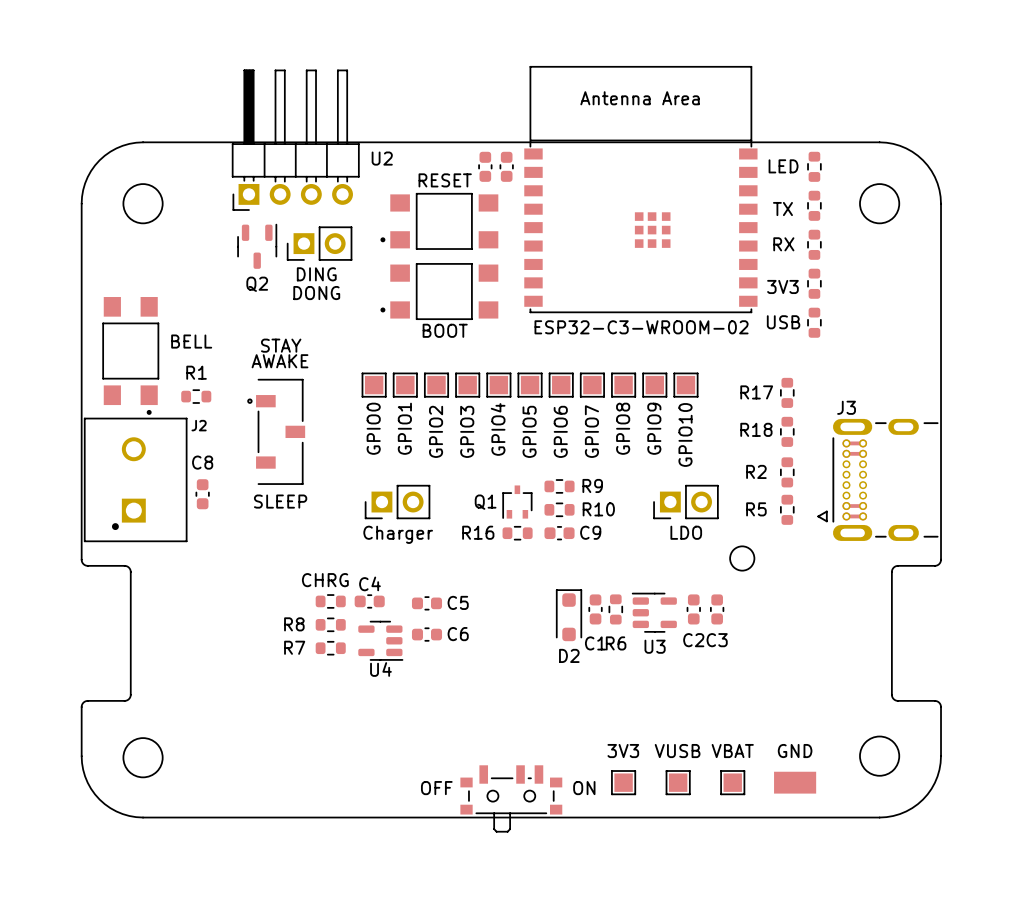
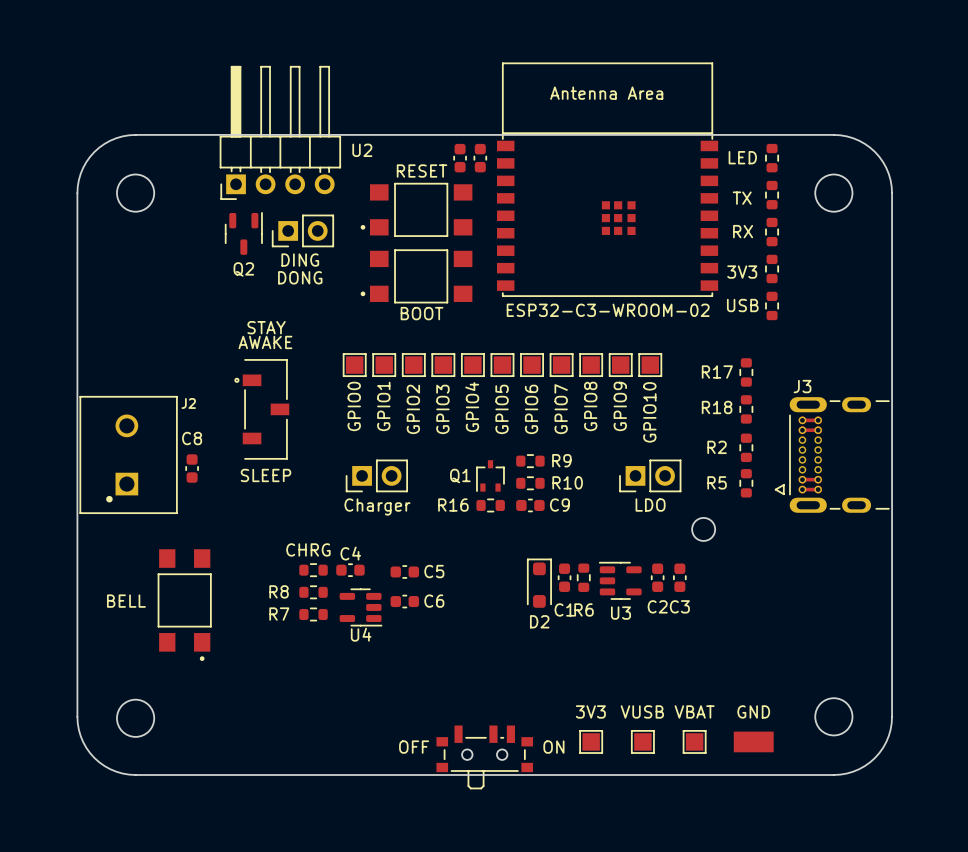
part: (130, 355) -> none
R1: (196, 396) -> none
board edge: (81, 559) (82, 563) (86, 565) (126, 566) (130, 572) (130, 697) (125, 700) (86, 701) (81, 707) -> (77, 530) (77, 670)
board edge: (941, 559) (939, 563) (935, 565) (896, 566) (891, 572) (892, 697) (897, 700) (936, 701) (941, 707) -> (892, 530) (892, 670)
part: none -> (184, 605)

